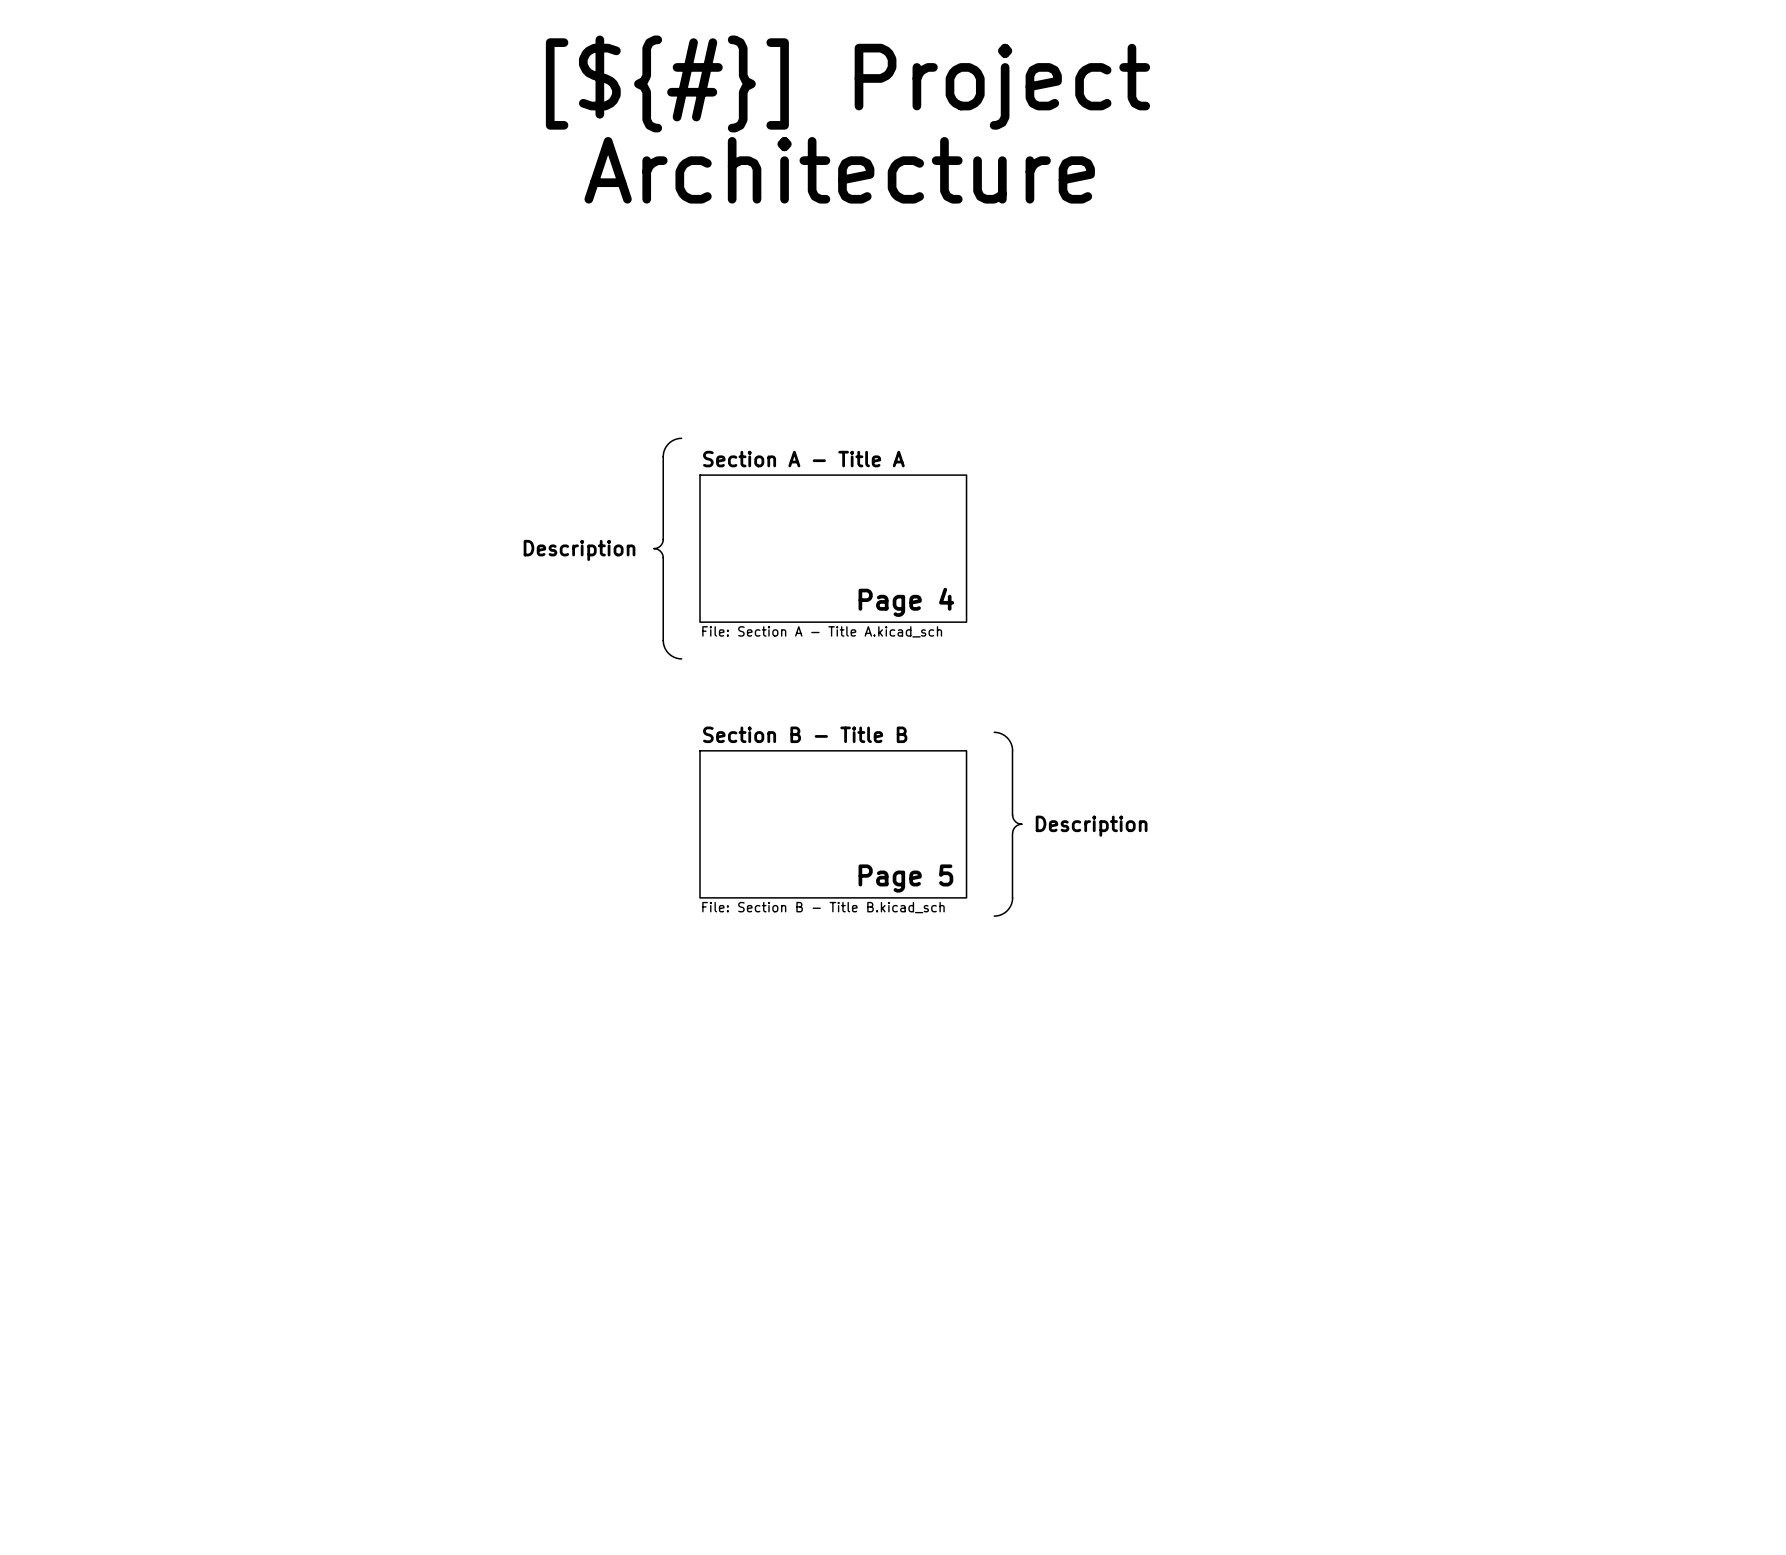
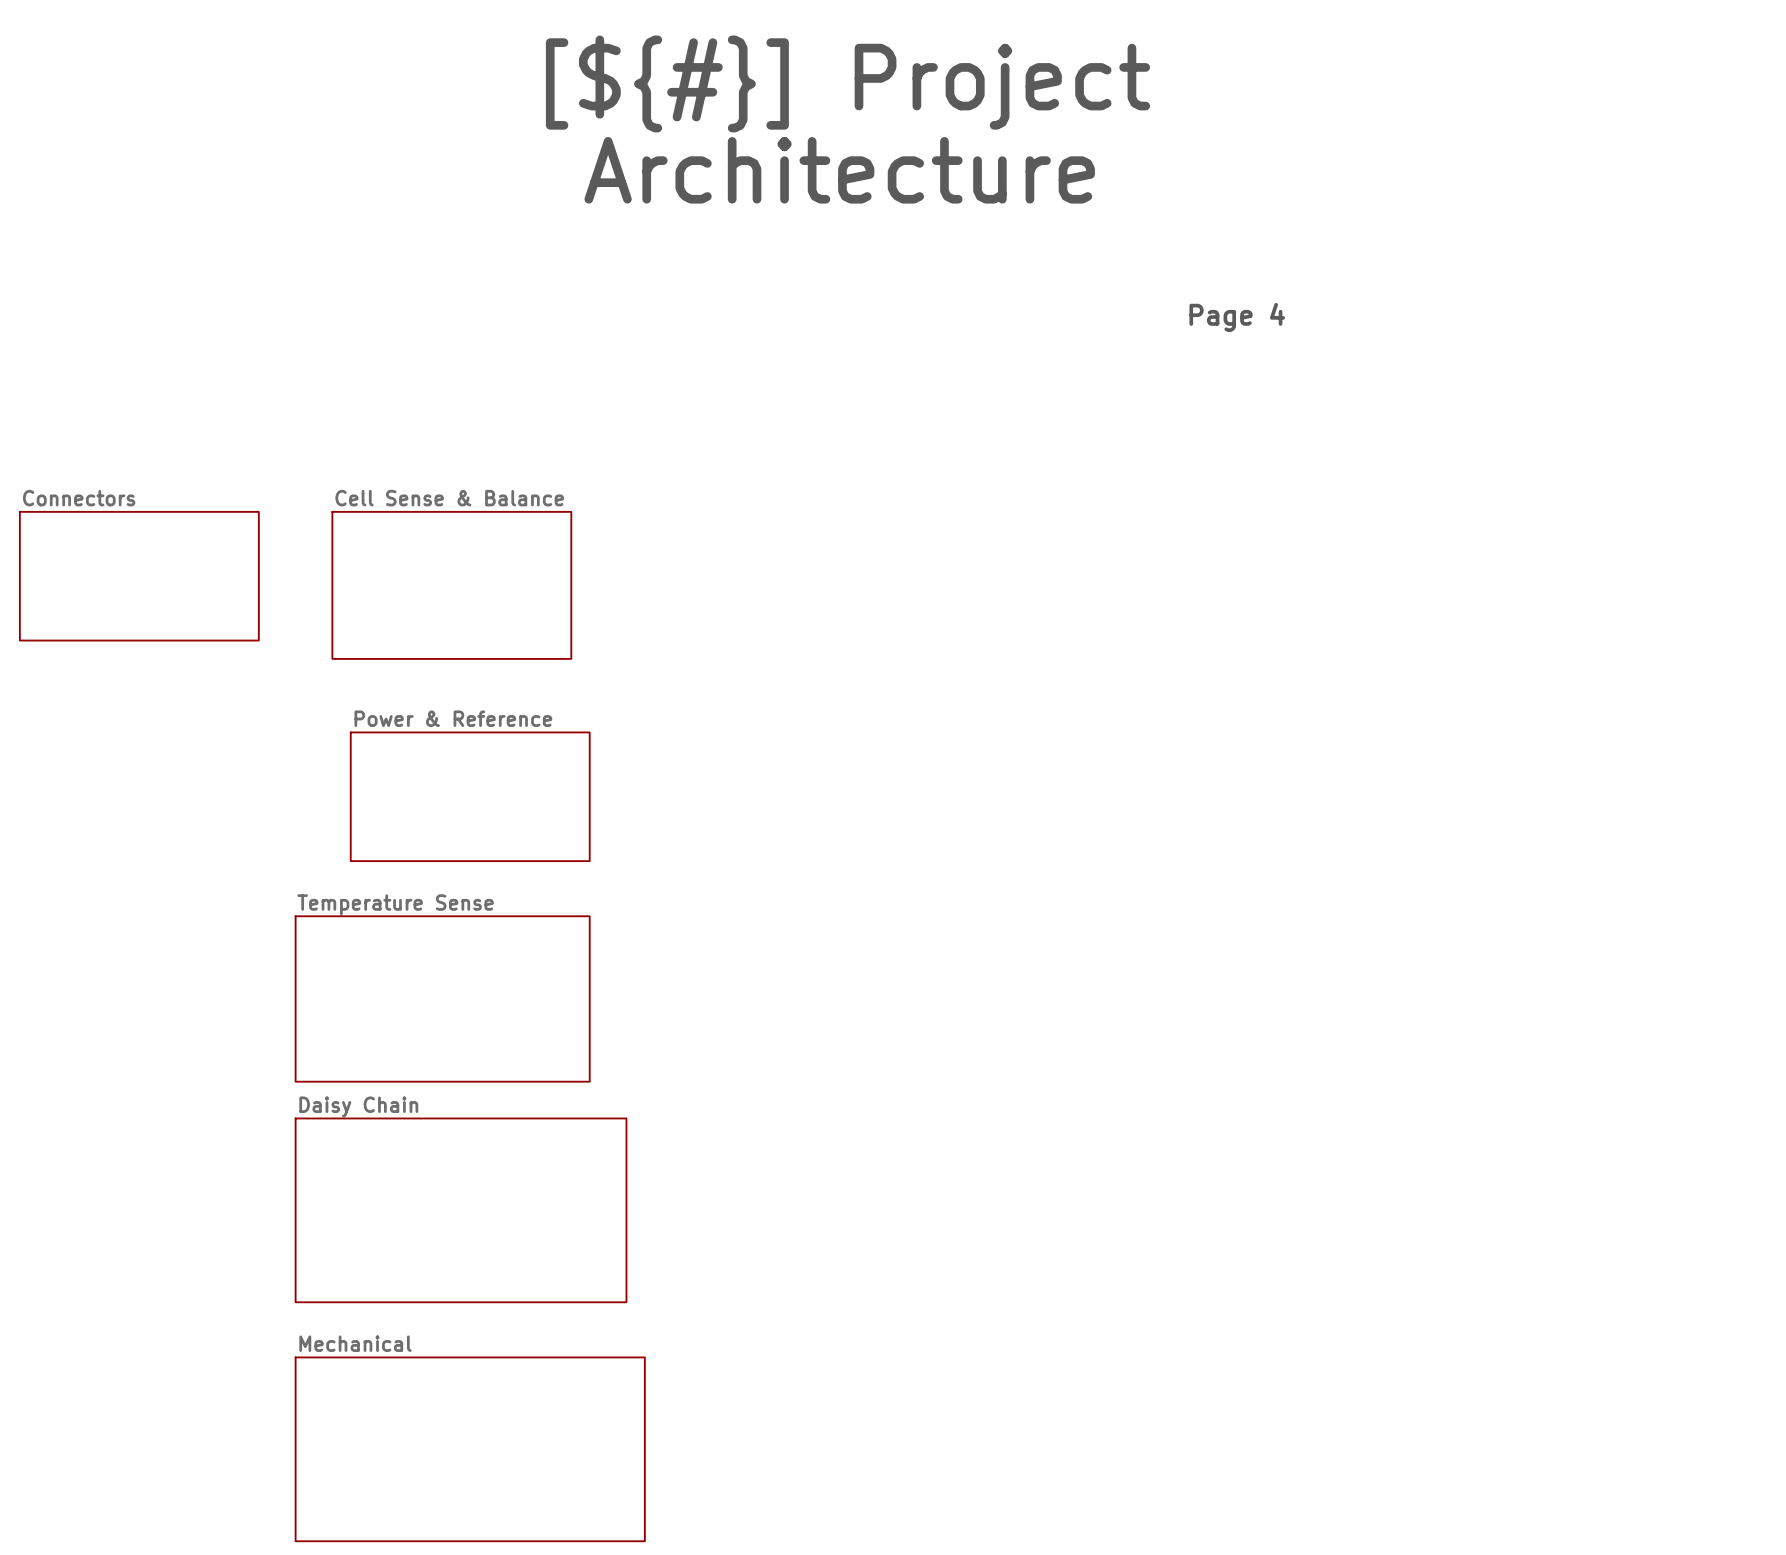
text: none -> Page 4 (1237, 317)
line: (681, 438) (670, 442) (663, 452) (663, 540) (659, 546) (654, 548) (659, 550) (663, 556) (663, 645) (670, 655) (681, 658) -> none
sheet Section A - Title A: File: Section A - Title A.kicad_sch (833, 548) -> none
text: Description (579, 550) -> none
sheet Connectors: none -> (139, 576)
sheet Cell Sense & Balance: none -> (451, 585)
text: Page 4 (906, 602) -> none
line: (994, 732) (1007, 737) (1012, 750) -> none
line: (1012, 750) (1012, 815) -> none
sheet Power & Reference: none -> (470, 796)
line: (1012, 815) (1015, 821) (1021, 824) (1015, 826) (1012, 833) -> none
sheet Section B - Title B: File: Section B - Title B.kicad_sch (833, 824) -> none
text: Description (1091, 826) -> none
line: (1012, 833) (1012, 897) -> none
text: Page 5 (905, 878) -> none
line: (1012, 897) (1007, 910) (994, 916) -> none
sheet Temperature Sense: none -> (442, 998)
sheet Daisy Chain: none -> (461, 1210)
sheet Mechanical: none -> (470, 1449)

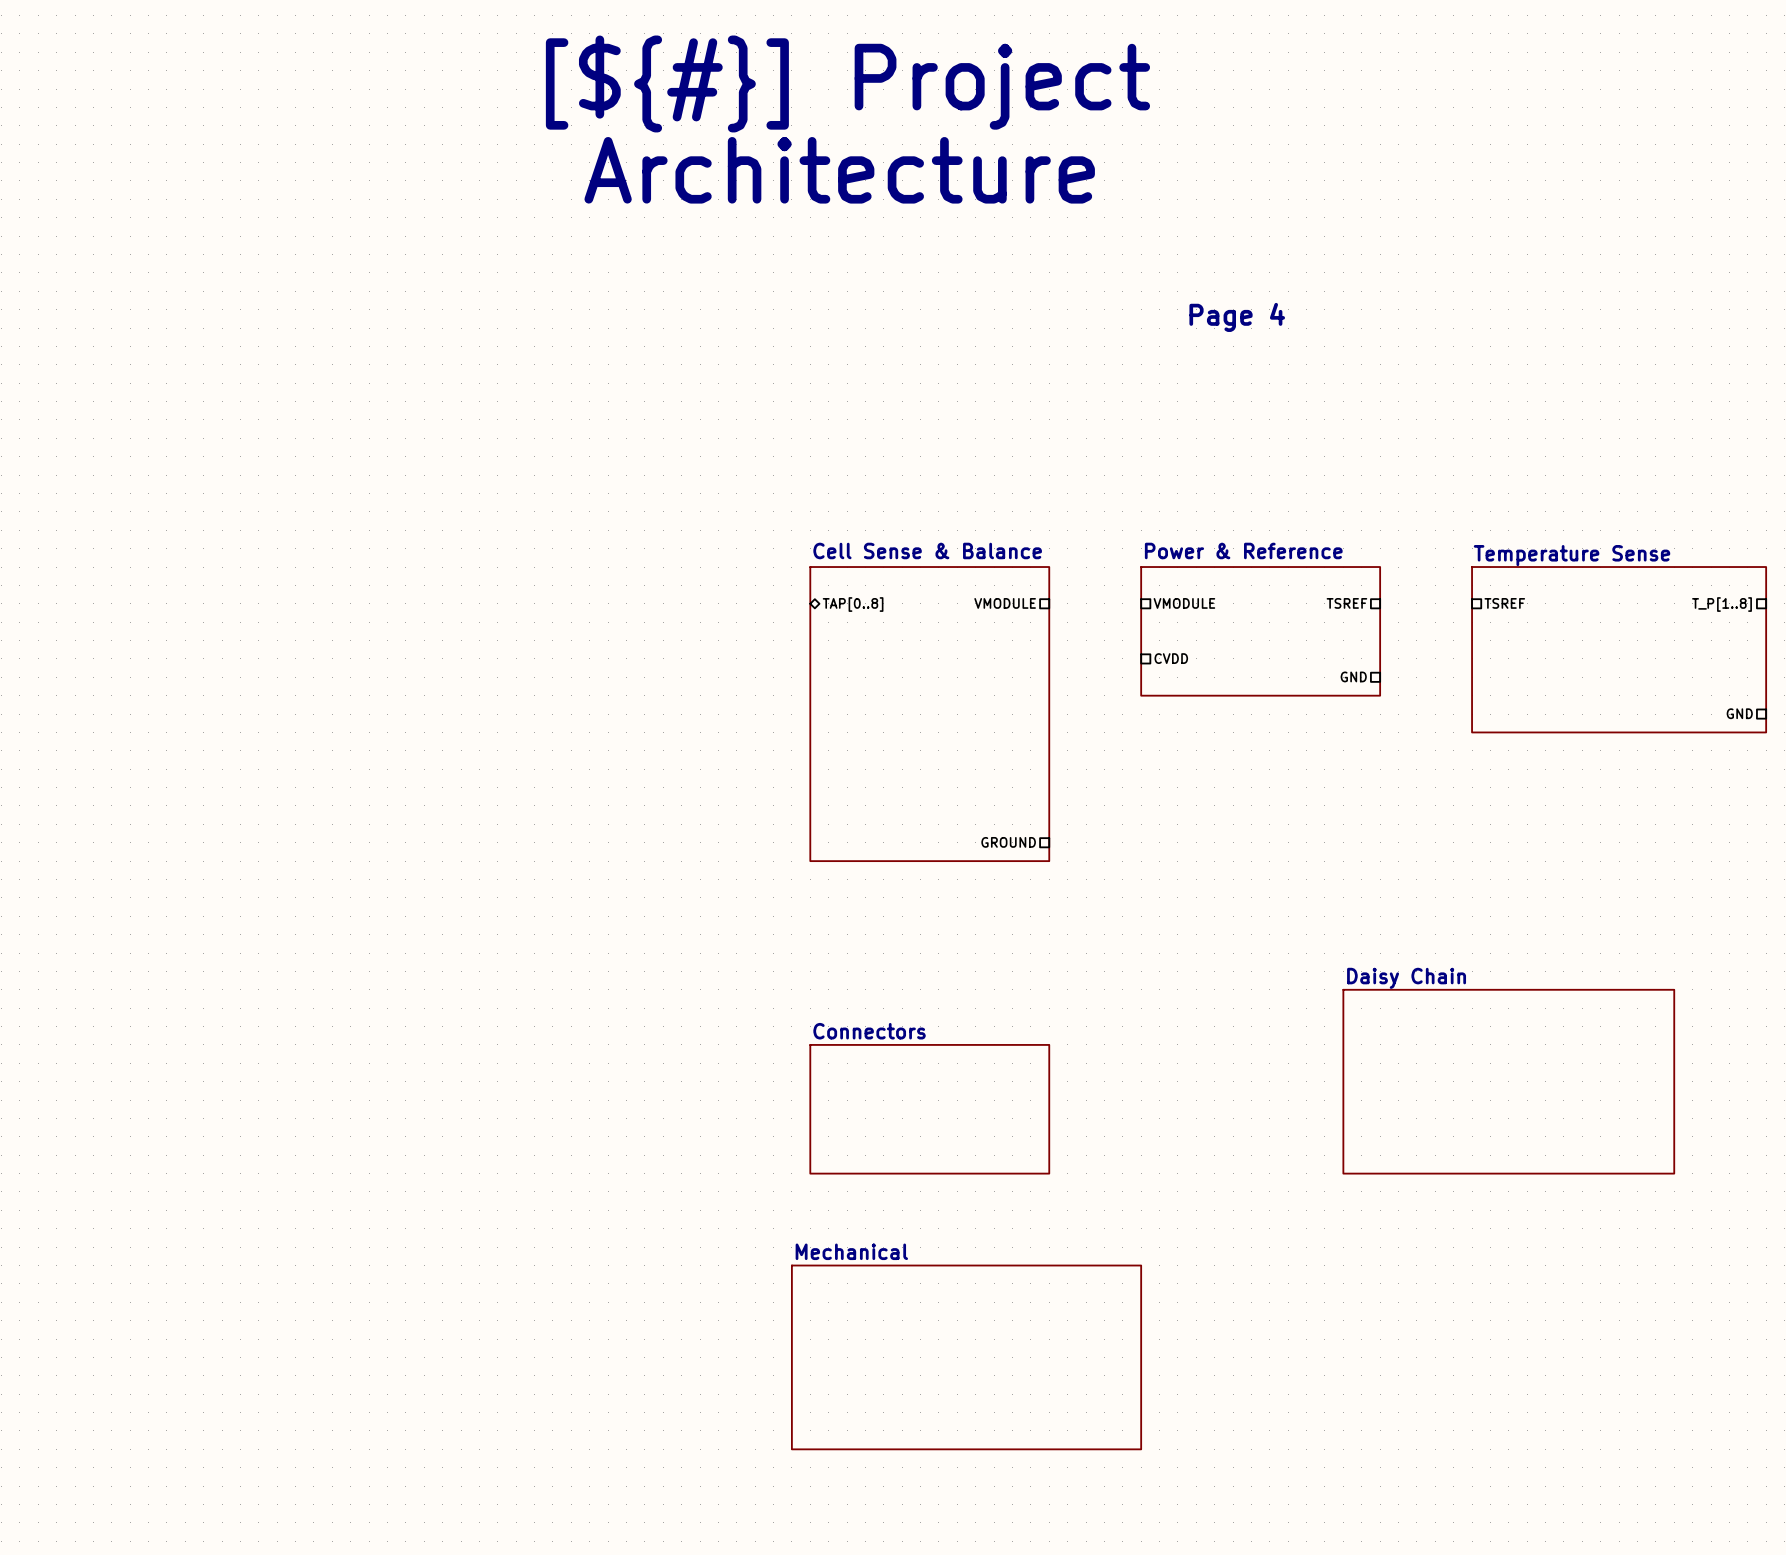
sheet Connectors: (139, 576) -> none
sheet Cell Sense & Balance: (451, 585) -> none
sheet pin: none -> VMODULE (1005, 603)
sheet pin: none -> VMODULE (1184, 603)
sheet pin: none -> TSREF (1346, 603)
sheet pin: none -> TSREF (1504, 603)
sheet pin: none -> TAP[0..8] (853, 604)
sheet pin: none -> T_P[1..8] (1722, 604)
sheet Power & Reference: none -> (1260, 631)
sheet Temperature Sense: none -> (1619, 649)
sheet pin: none -> CVDD (1171, 658)
sheet pin: none -> GND (1353, 676)
sheet pin: none -> GND (1739, 713)
sheet Cell Sense & Balance: none -> (929, 714)
sheet Power & Reference: (470, 796) -> none
sheet pin: none -> GROUND (1008, 842)
sheet Temperature Sense: (442, 998) -> none
sheet Daisy Chain: none -> (1508, 1081)
sheet Connectors: none -> (929, 1109)
sheet Daisy Chain: (461, 1210) -> none
sheet Mechanical: none -> (966, 1357)
sheet Mechanical: (470, 1449) -> none

